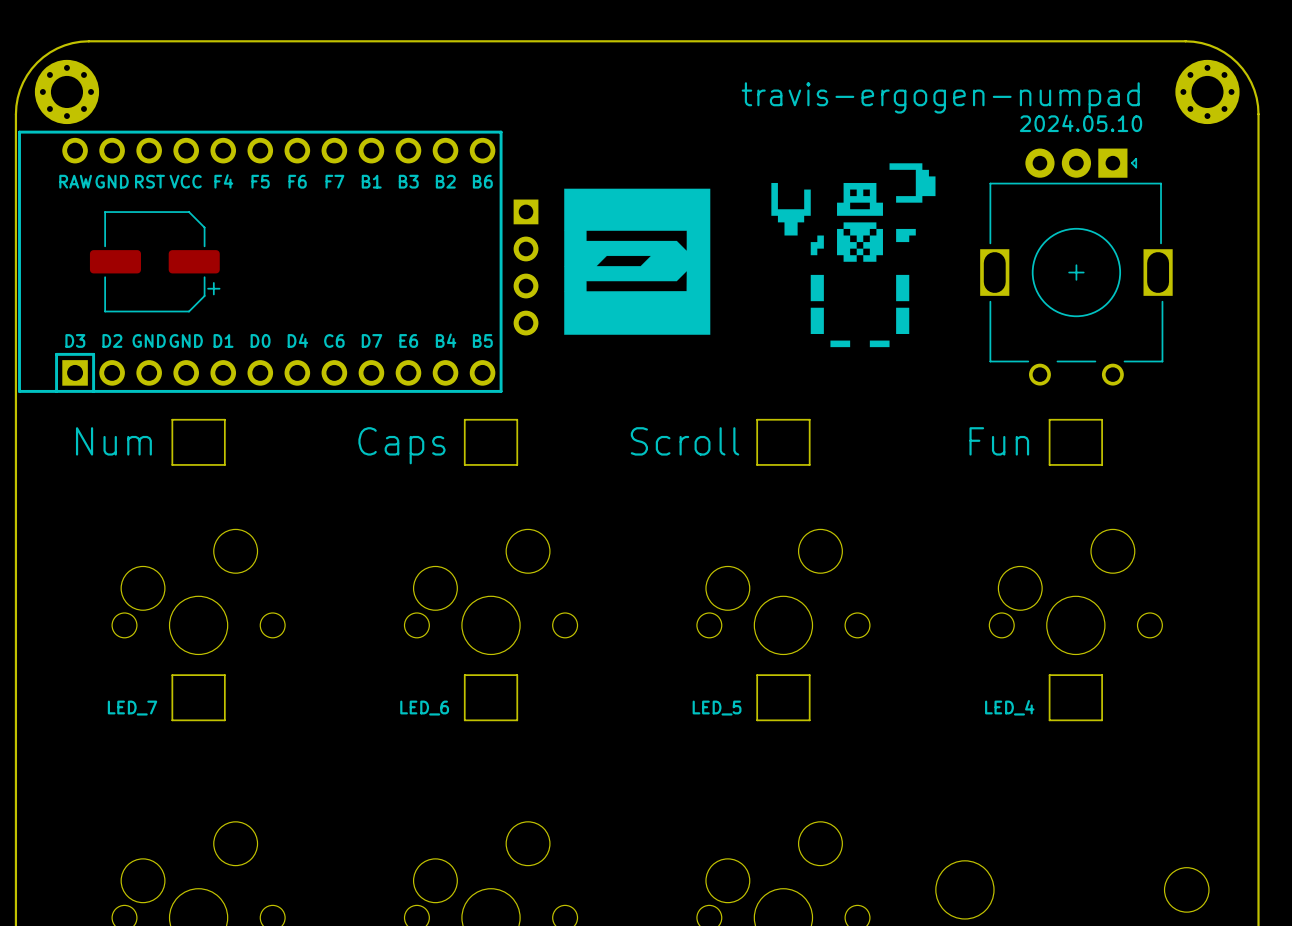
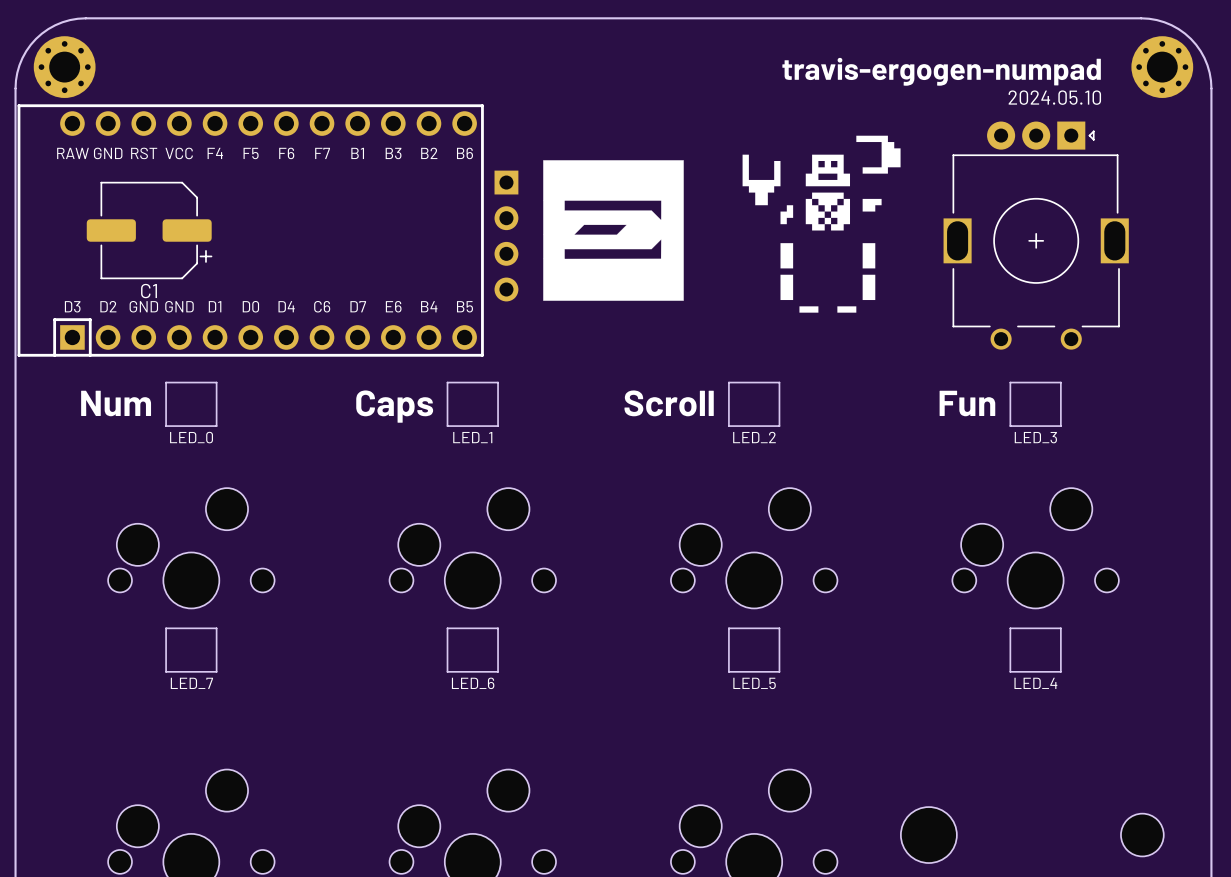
C1 name: none -> C1 (149, 291)
text: none -> LED_0 (191, 437)
text: none -> LED_1 (472, 437)
text: none -> LED_2 (754, 437)
text: none -> LED_3 (1035, 437)
text position: LED_4 (1009, 707) -> LED_4 (1035, 683)
text position: LED_7 (132, 708) -> LED_7 (191, 683)
text position: LED_6 (424, 708) -> LED_6 (473, 683)
text position: LED_5 (717, 708) -> LED_5 (754, 683)

